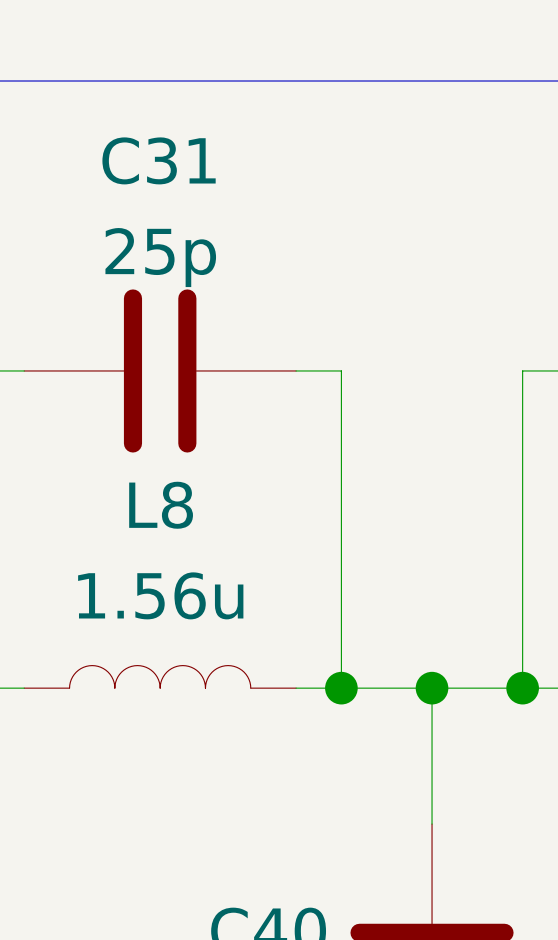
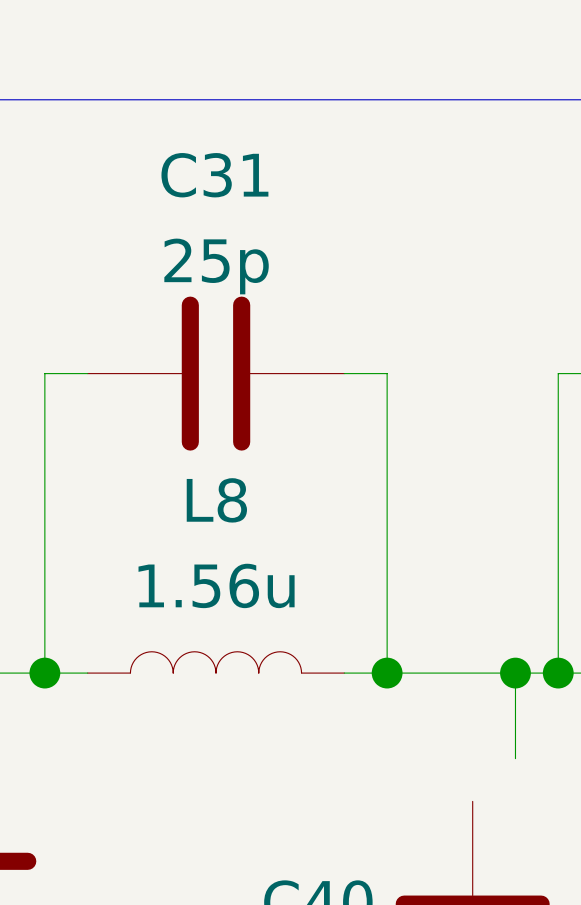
wire: (432, 688) (432, 824) -> none
junction position: (432, 688) -> (515, 673)
wire: none -> (515, 673) (515, 758)

